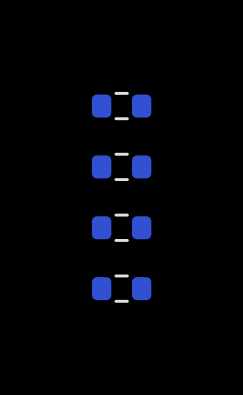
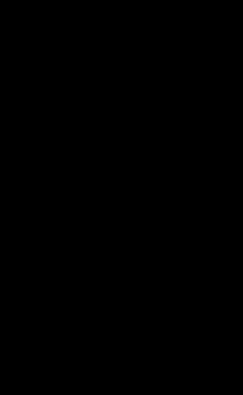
part: (121, 106) -> none
part: (121, 166) -> none
part: (121, 227) -> none
part: (121, 288) -> none

